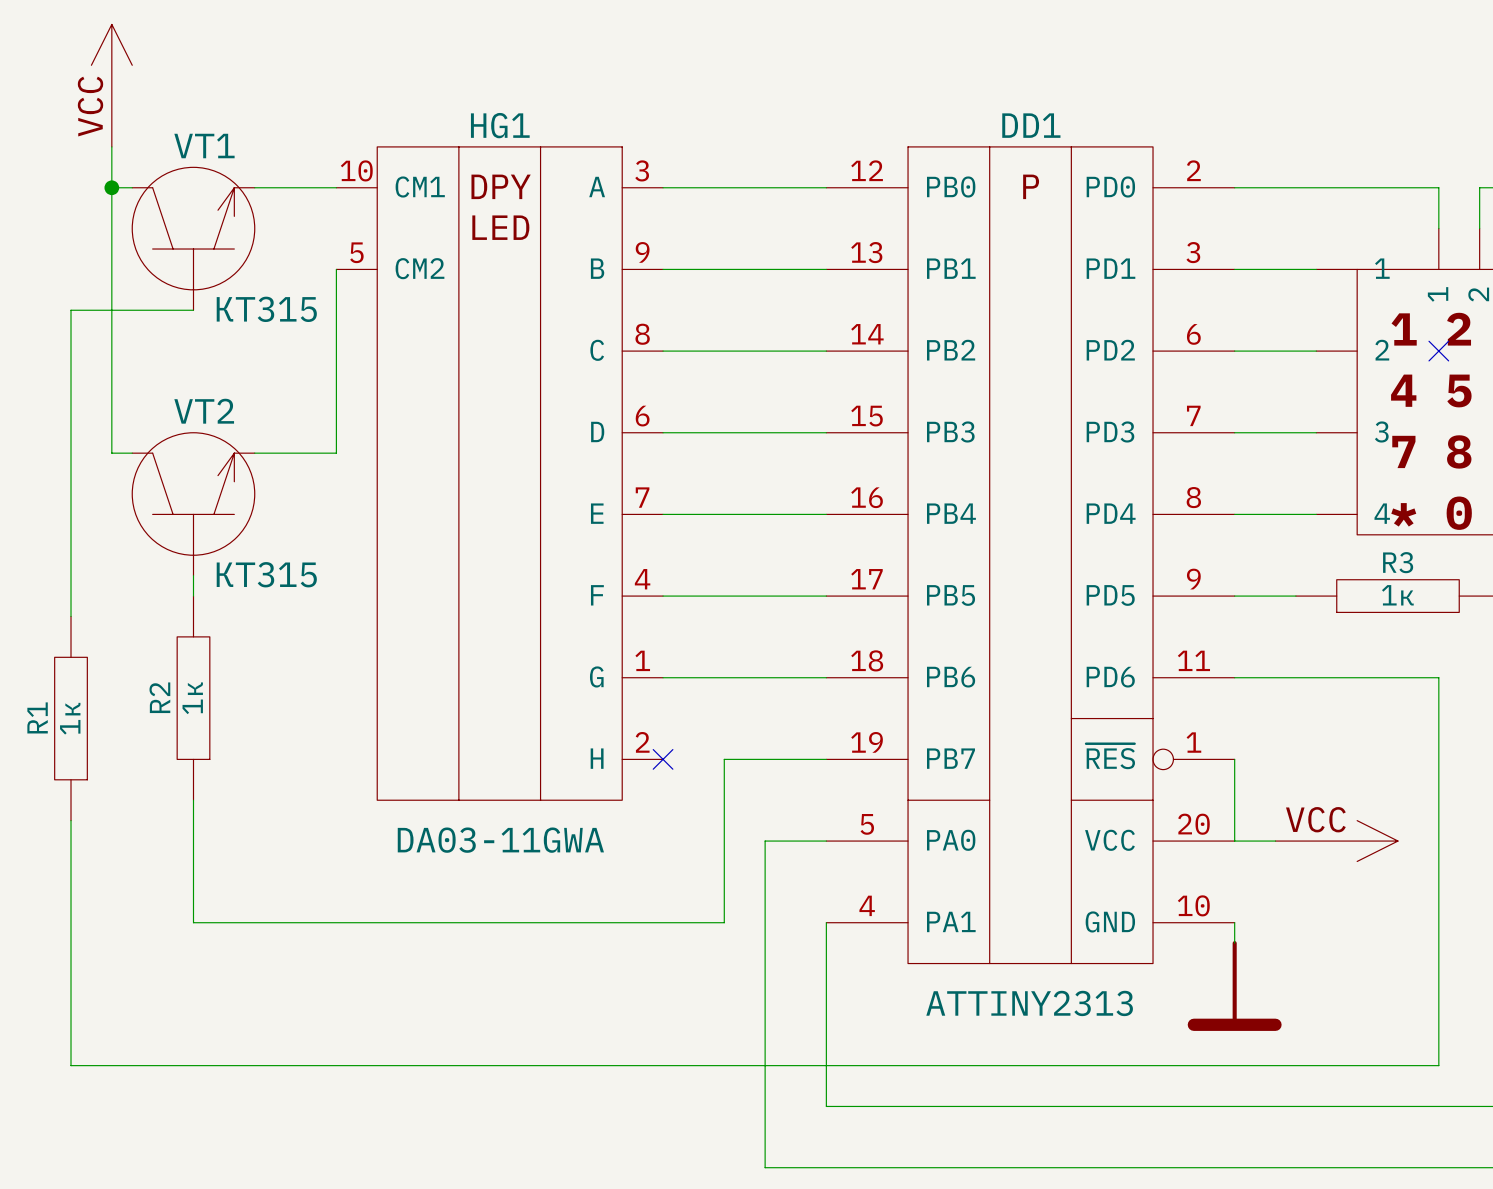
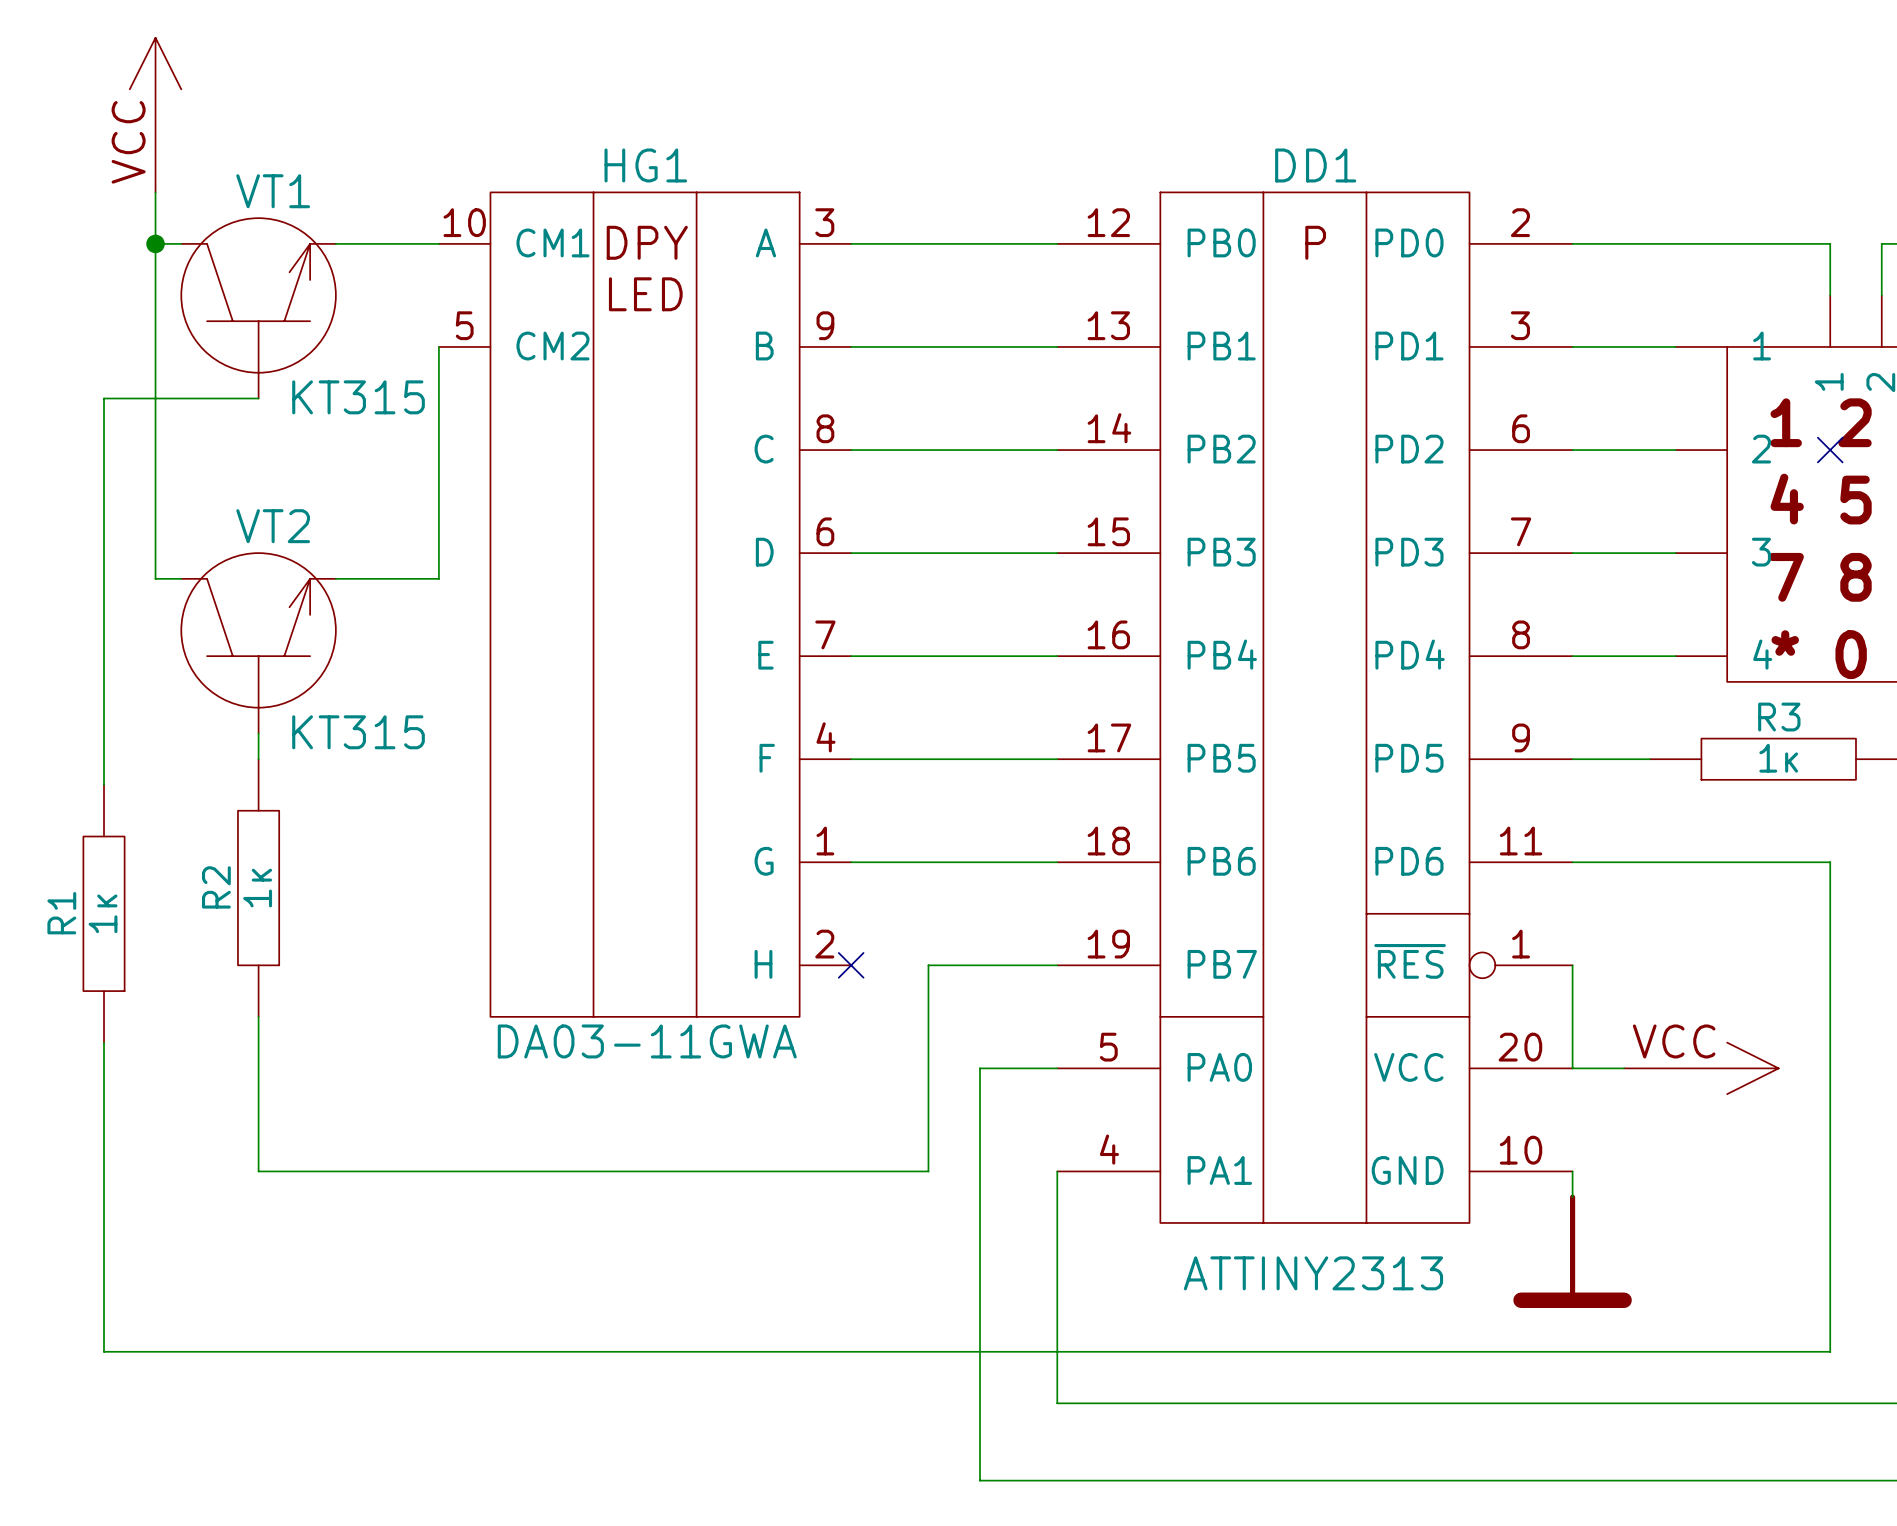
HG1 value position: DA03-11GWA (500, 840) -> DA03-11GWA (647, 1041)

